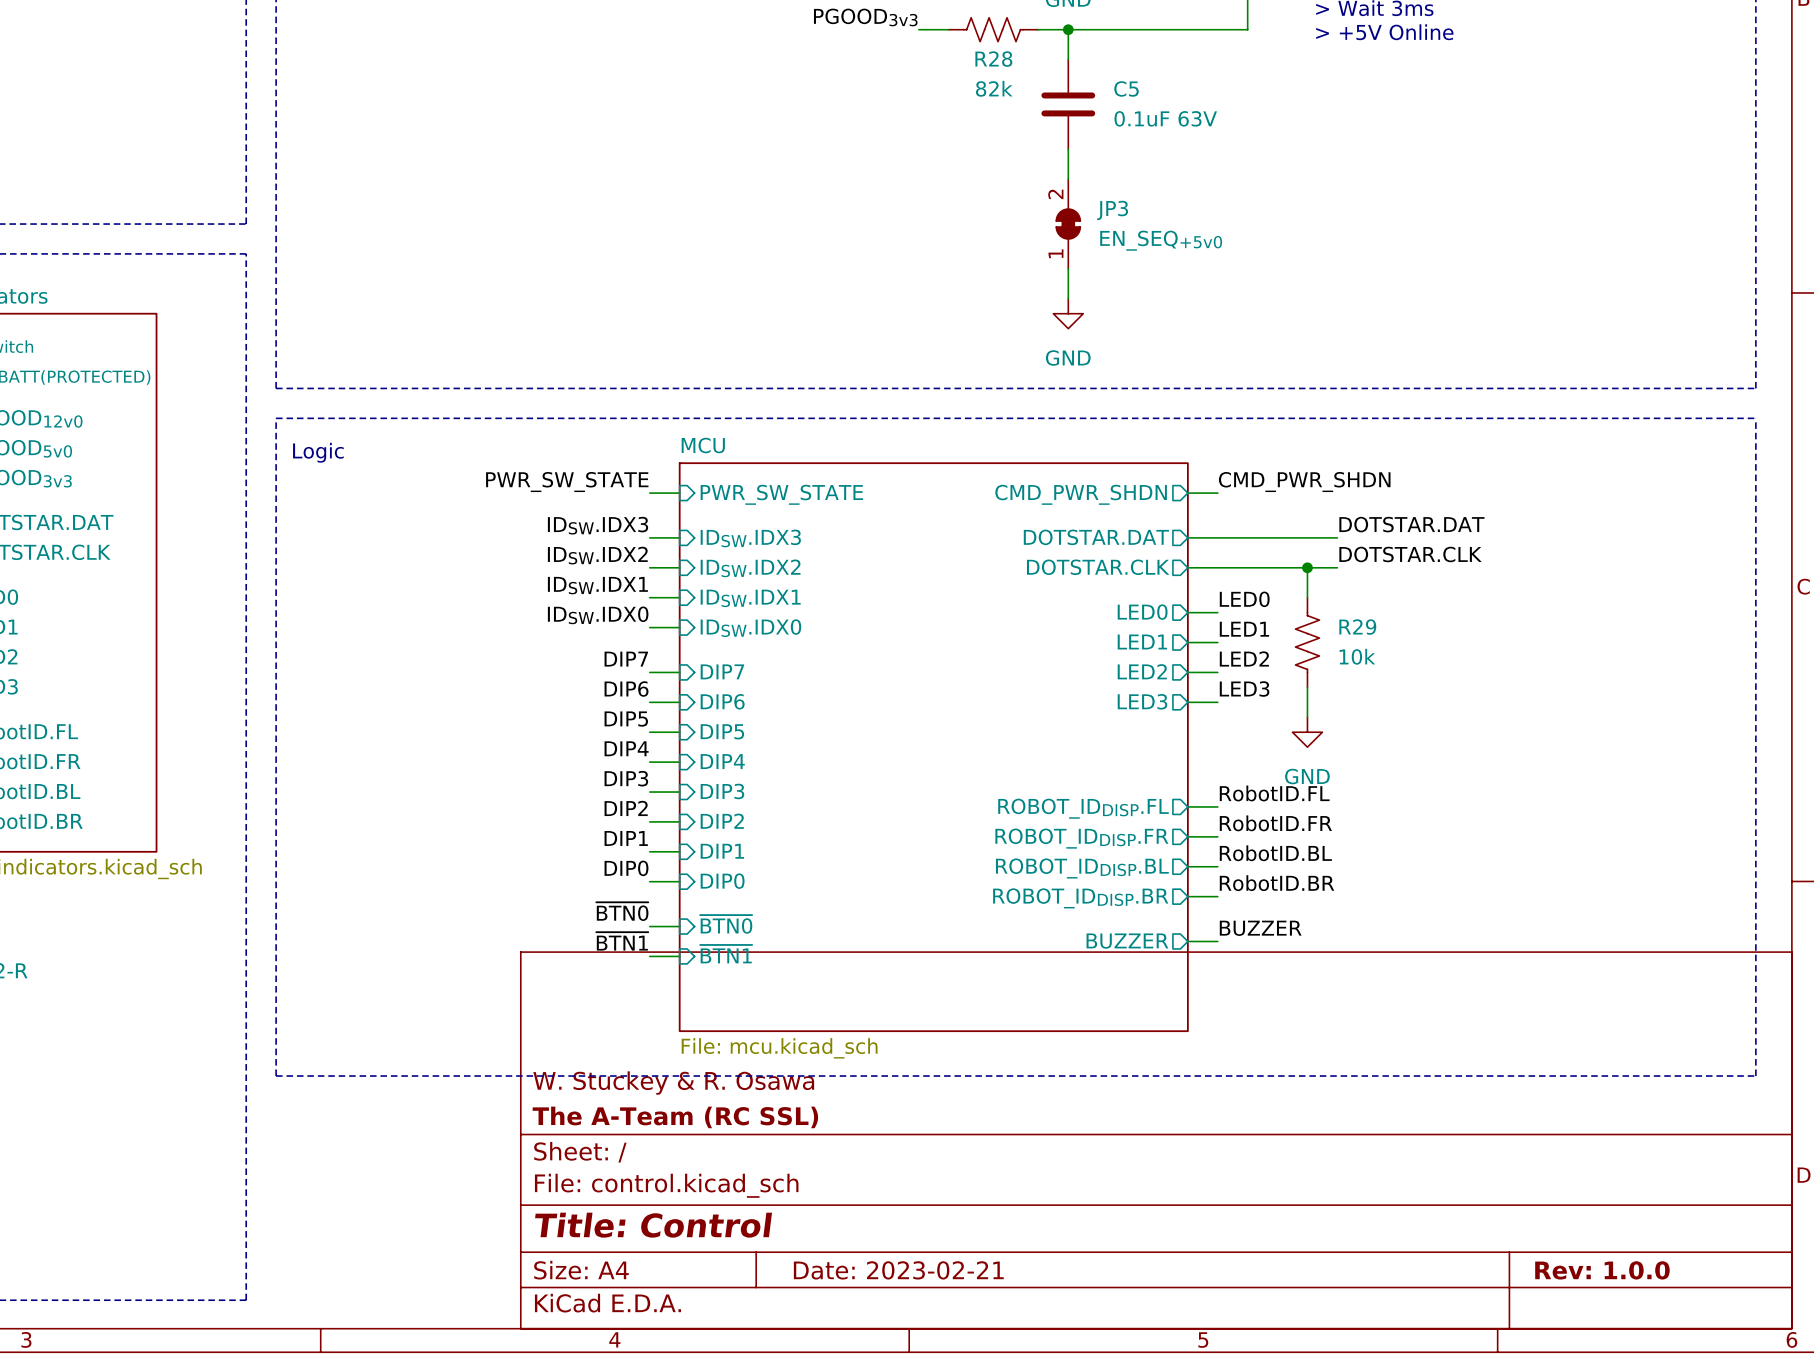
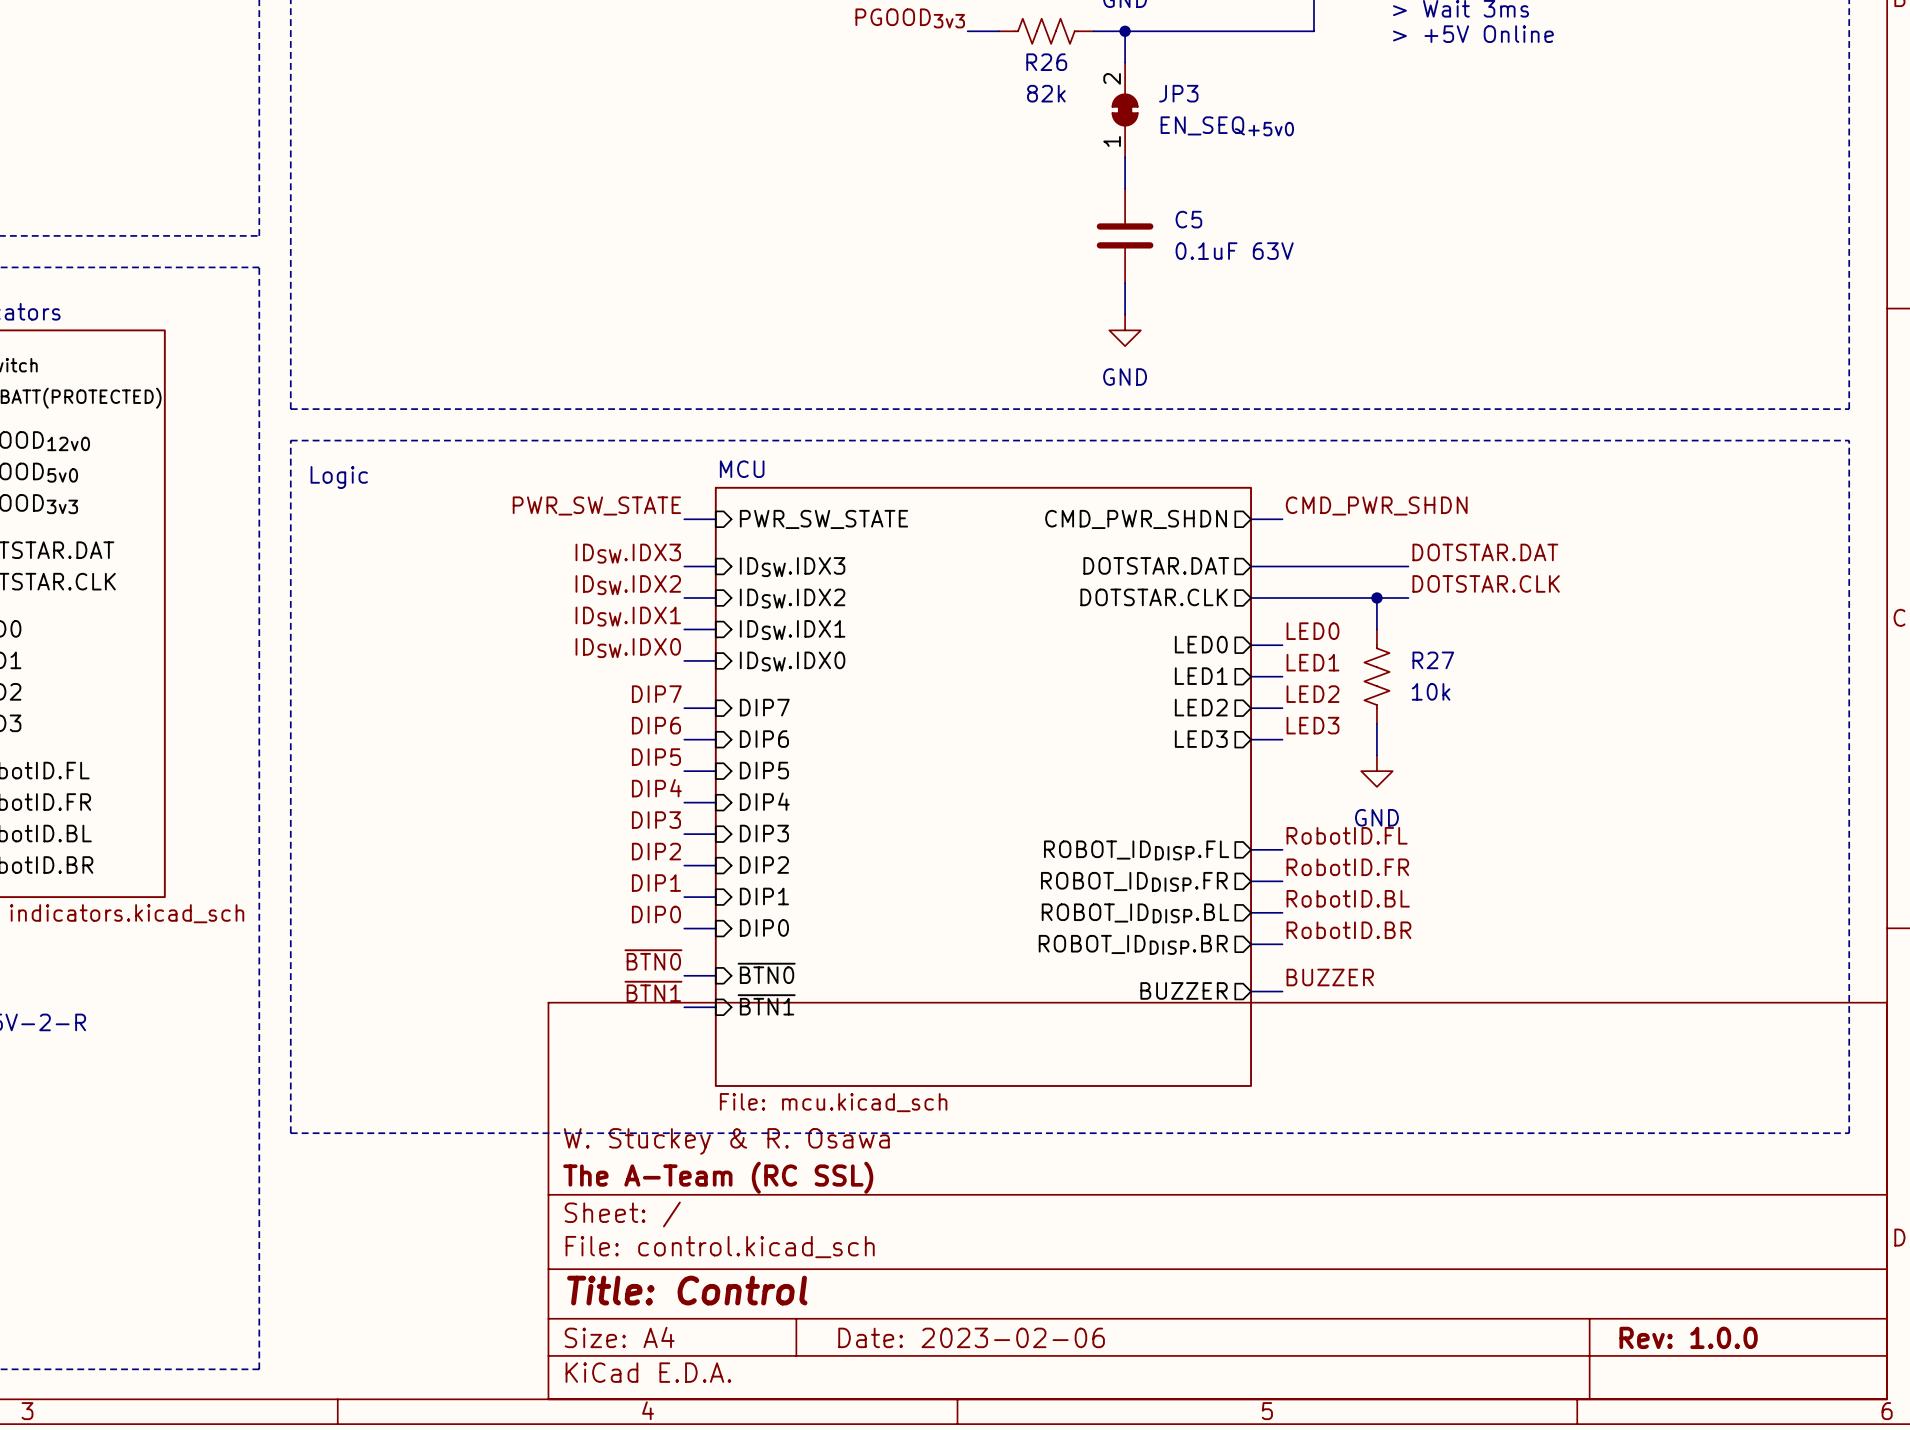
R28 name: R28 (993, 59) -> R26 (1046, 62)
C5 position: (1068, 104) -> (1125, 235)
JP3 position: (1068, 224) -> (1125, 110)
R29 name: R29 (1357, 627) -> R27 (1433, 660)
title block: Date: 2023-02-21 (898, 1270) -> Date: 2023-02-06 (971, 1337)

